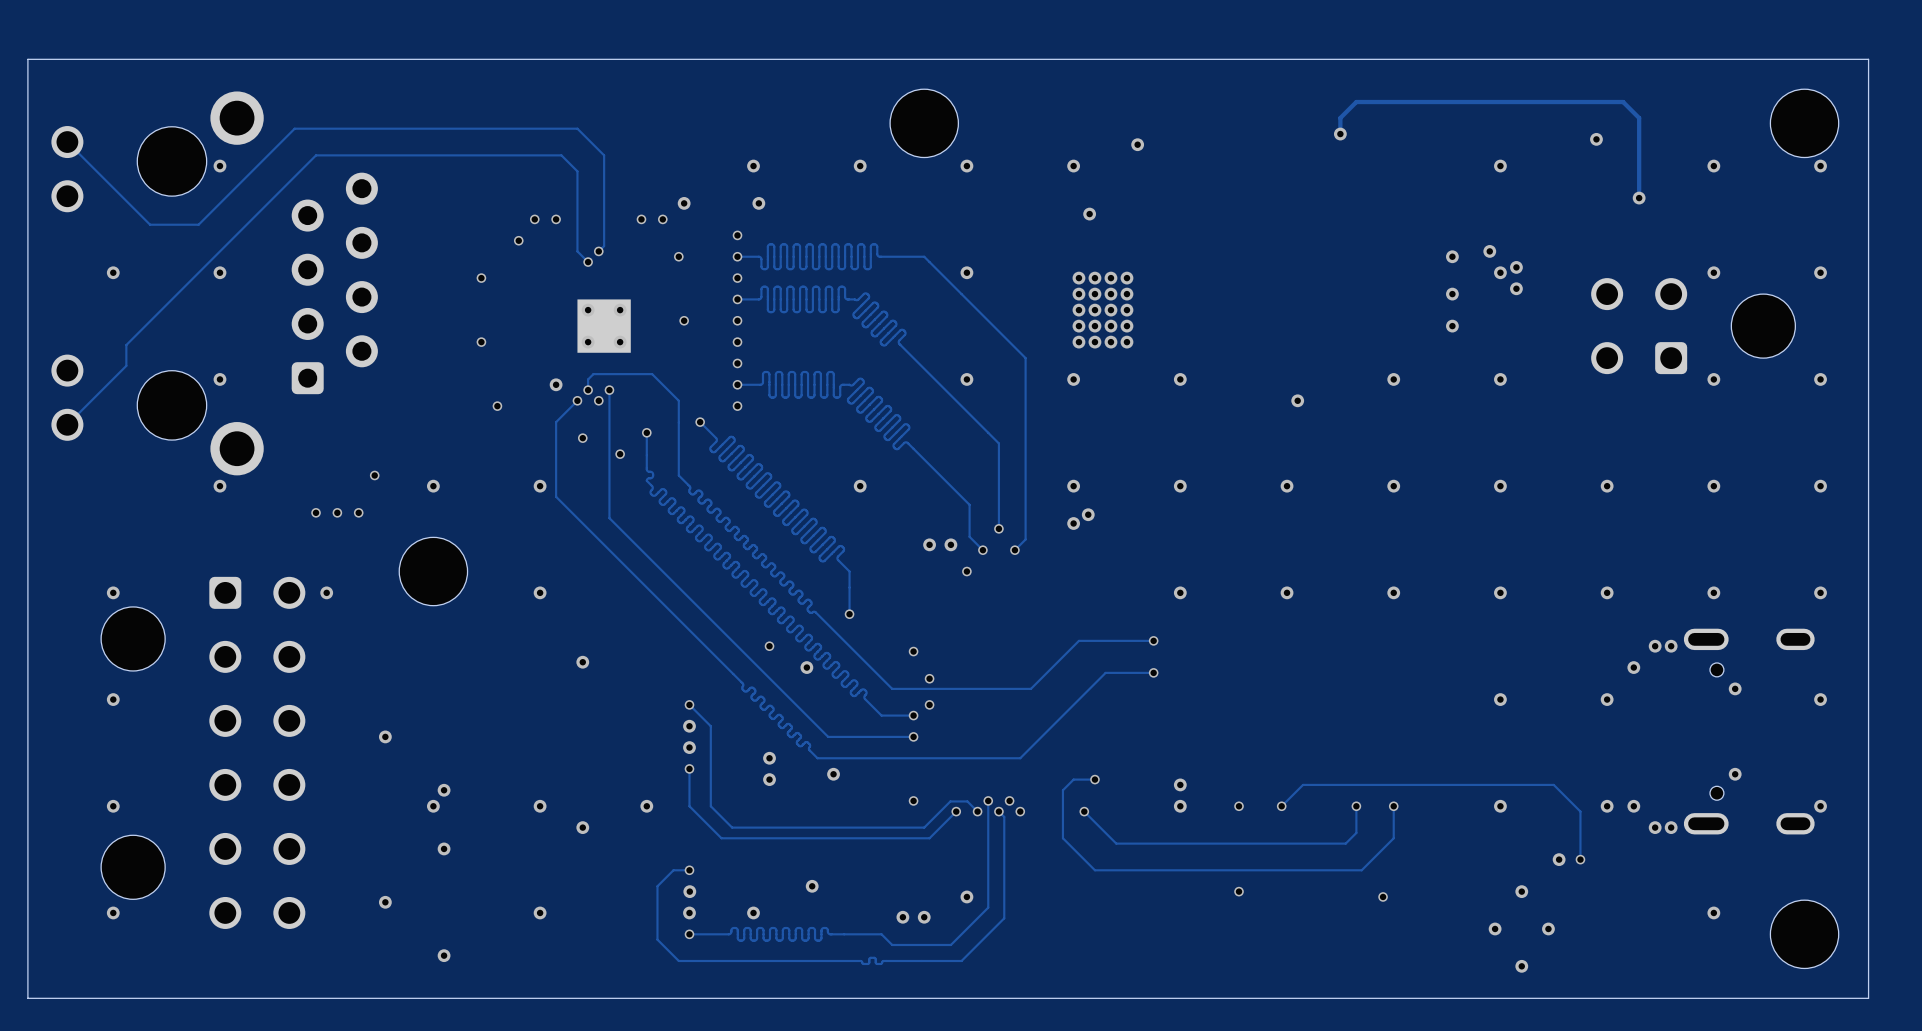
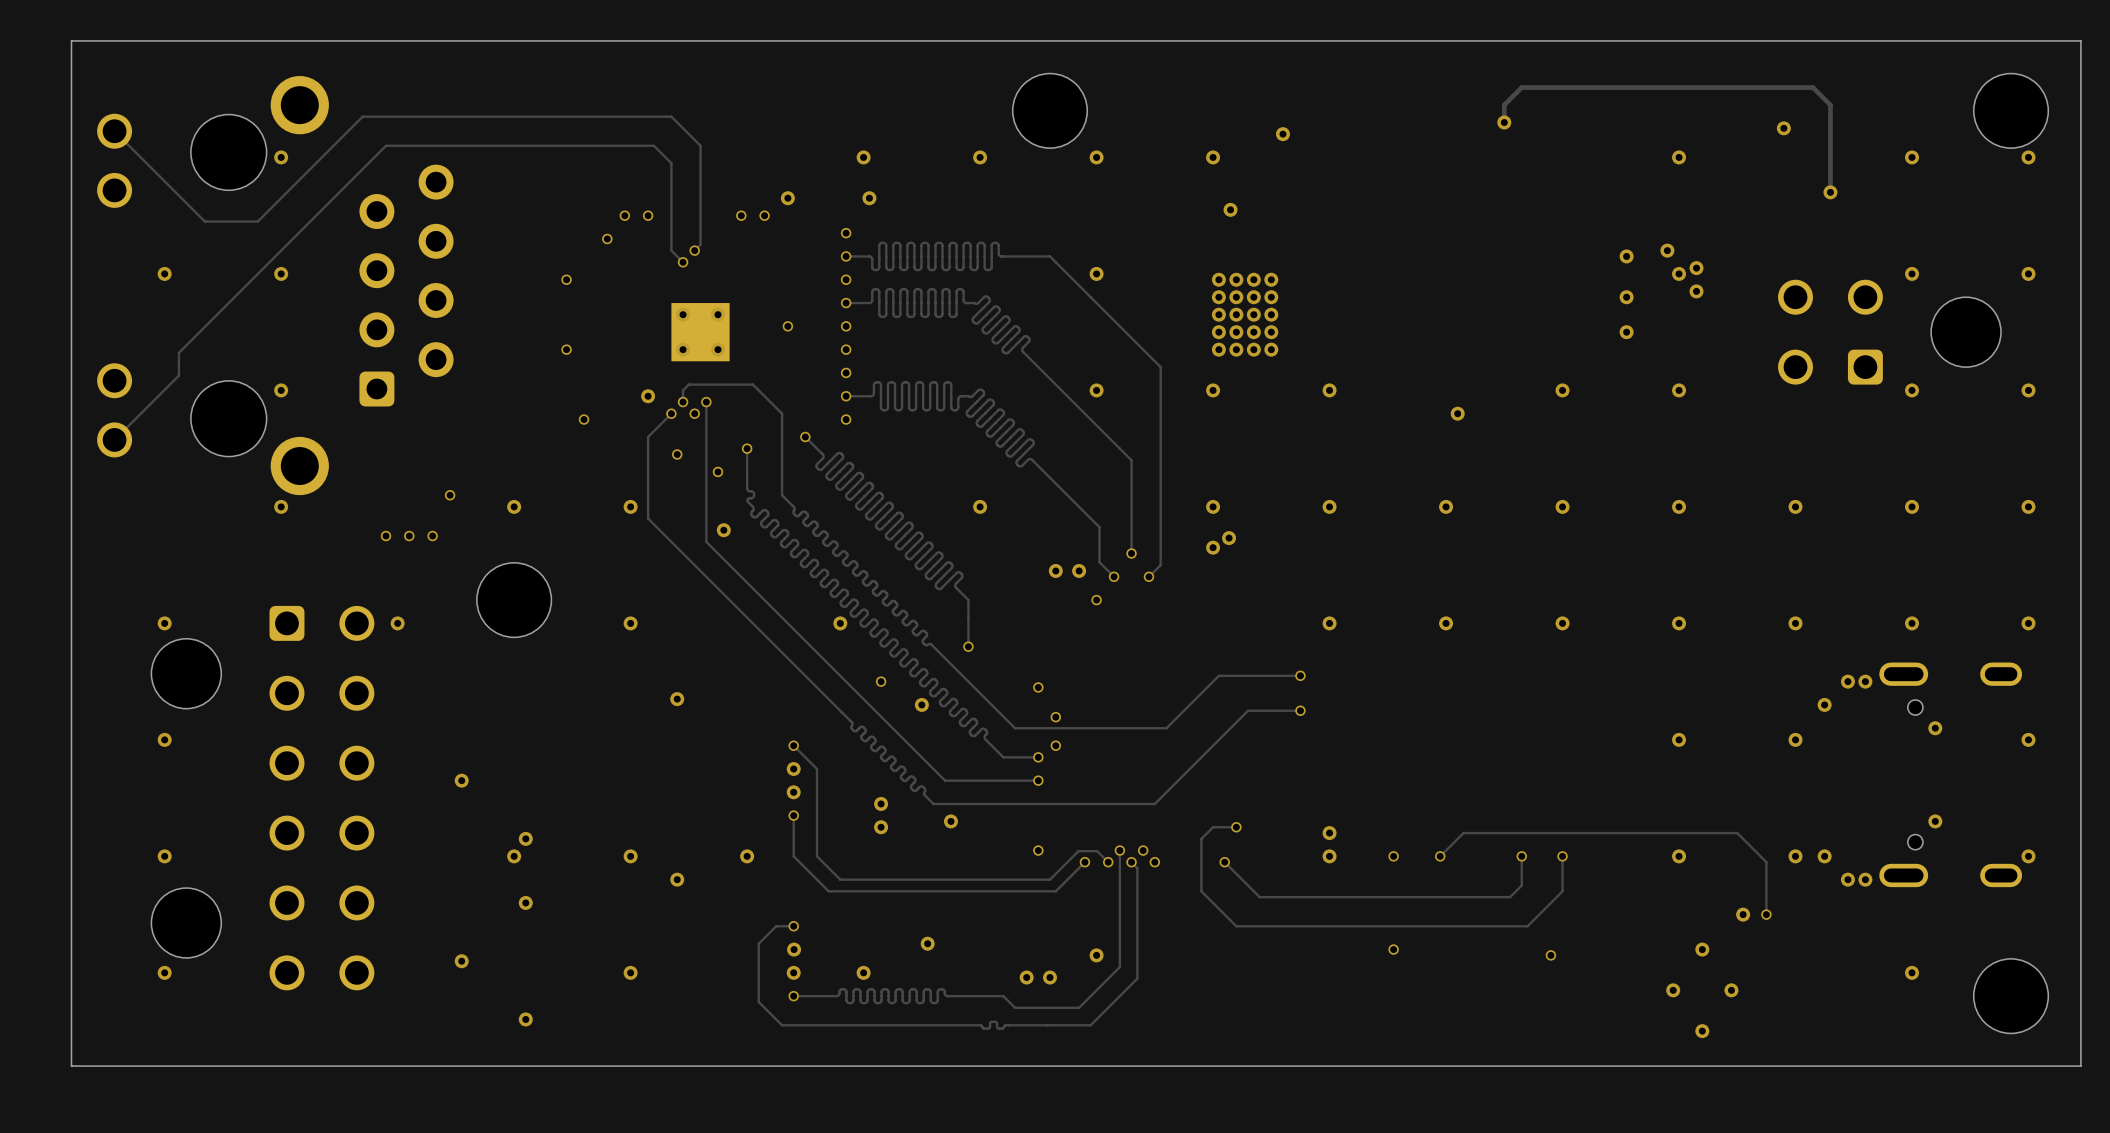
via: (678, 256) -> none
via: none -> (723, 530)
via: none -> (840, 623)

